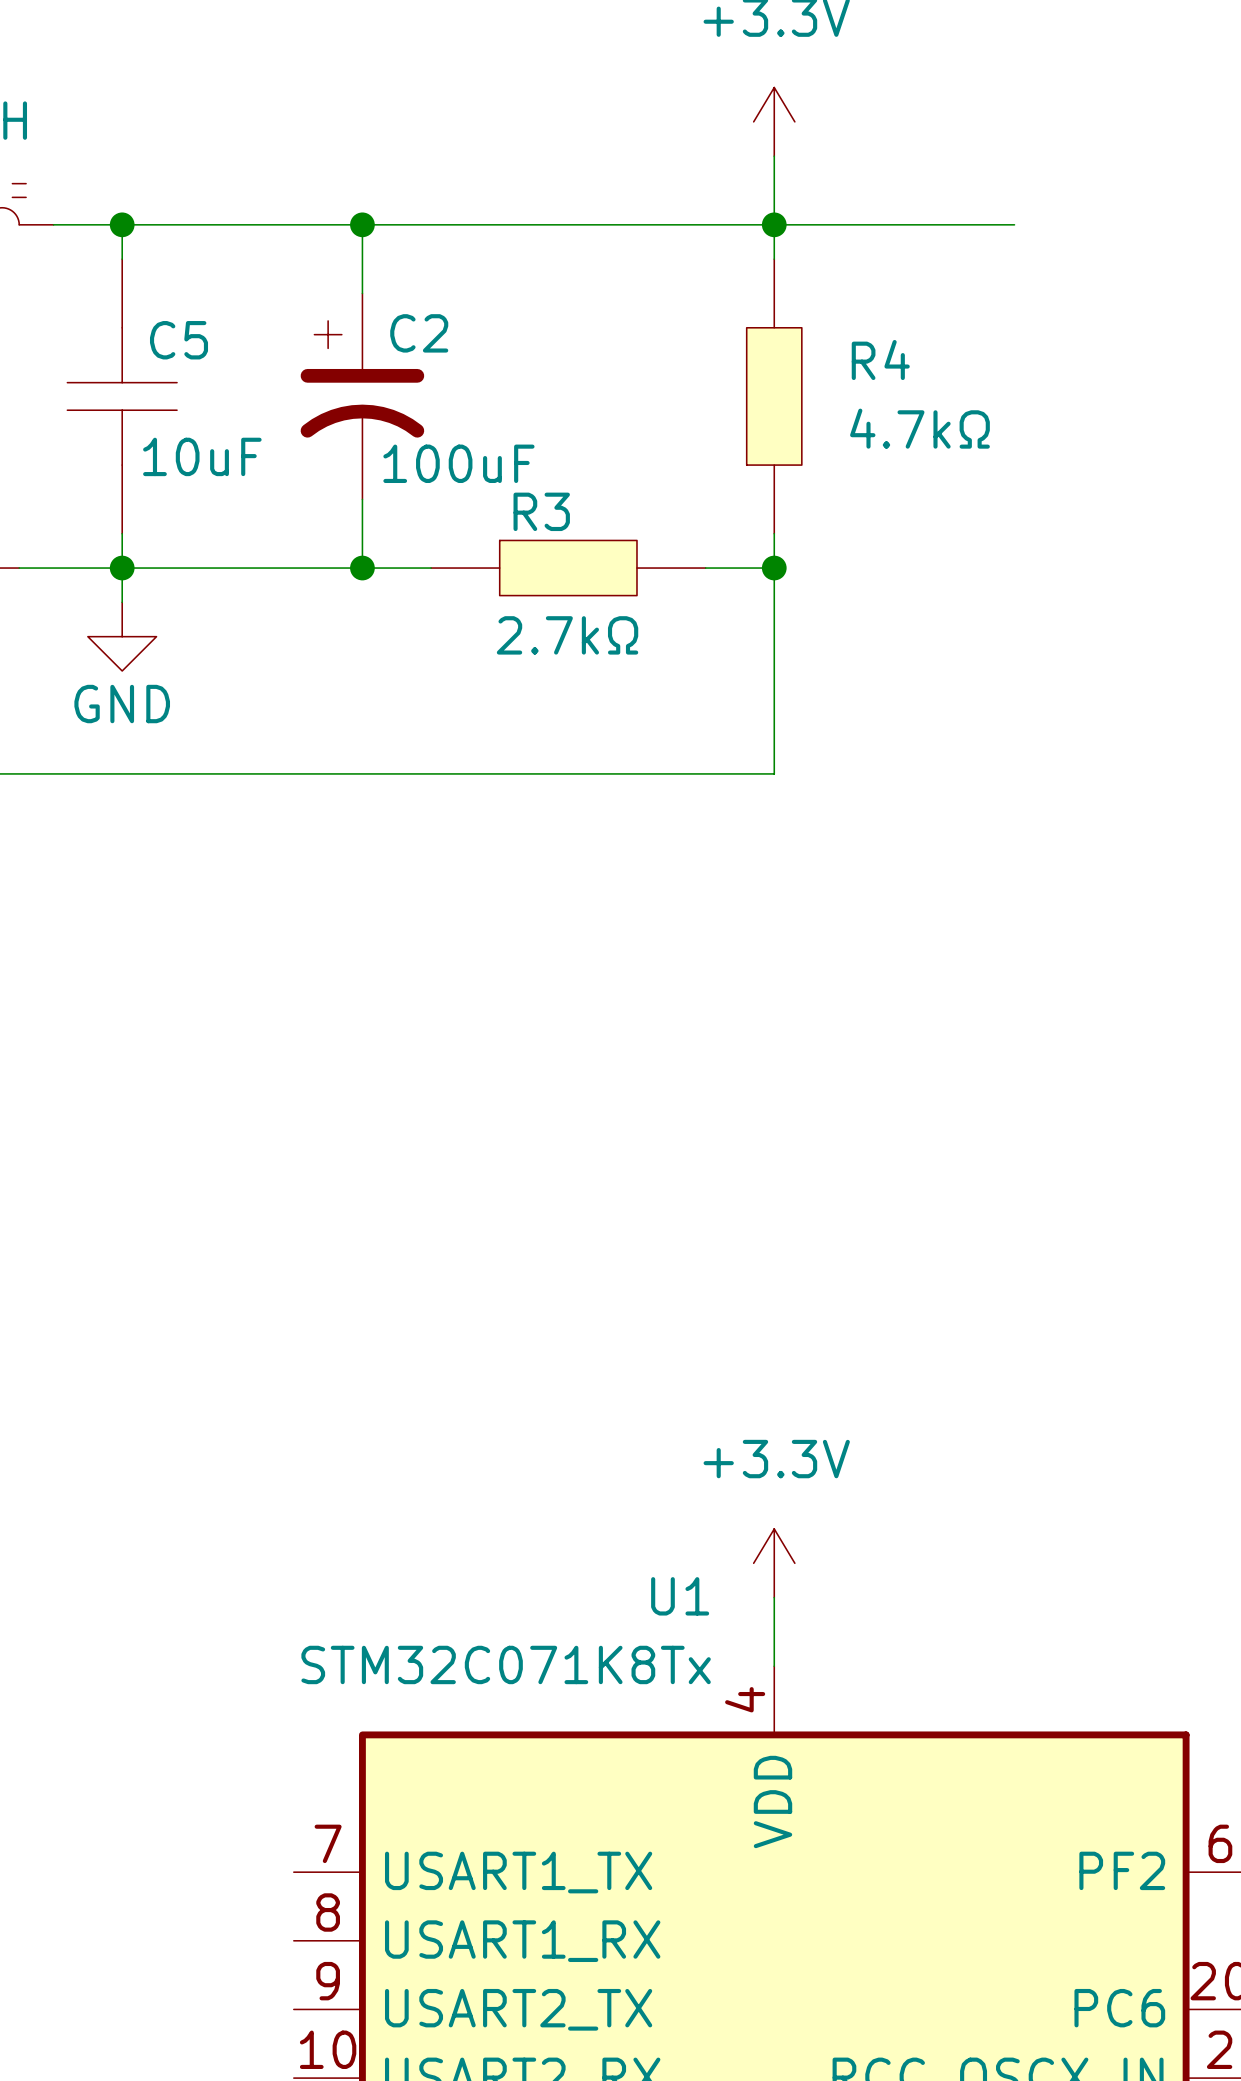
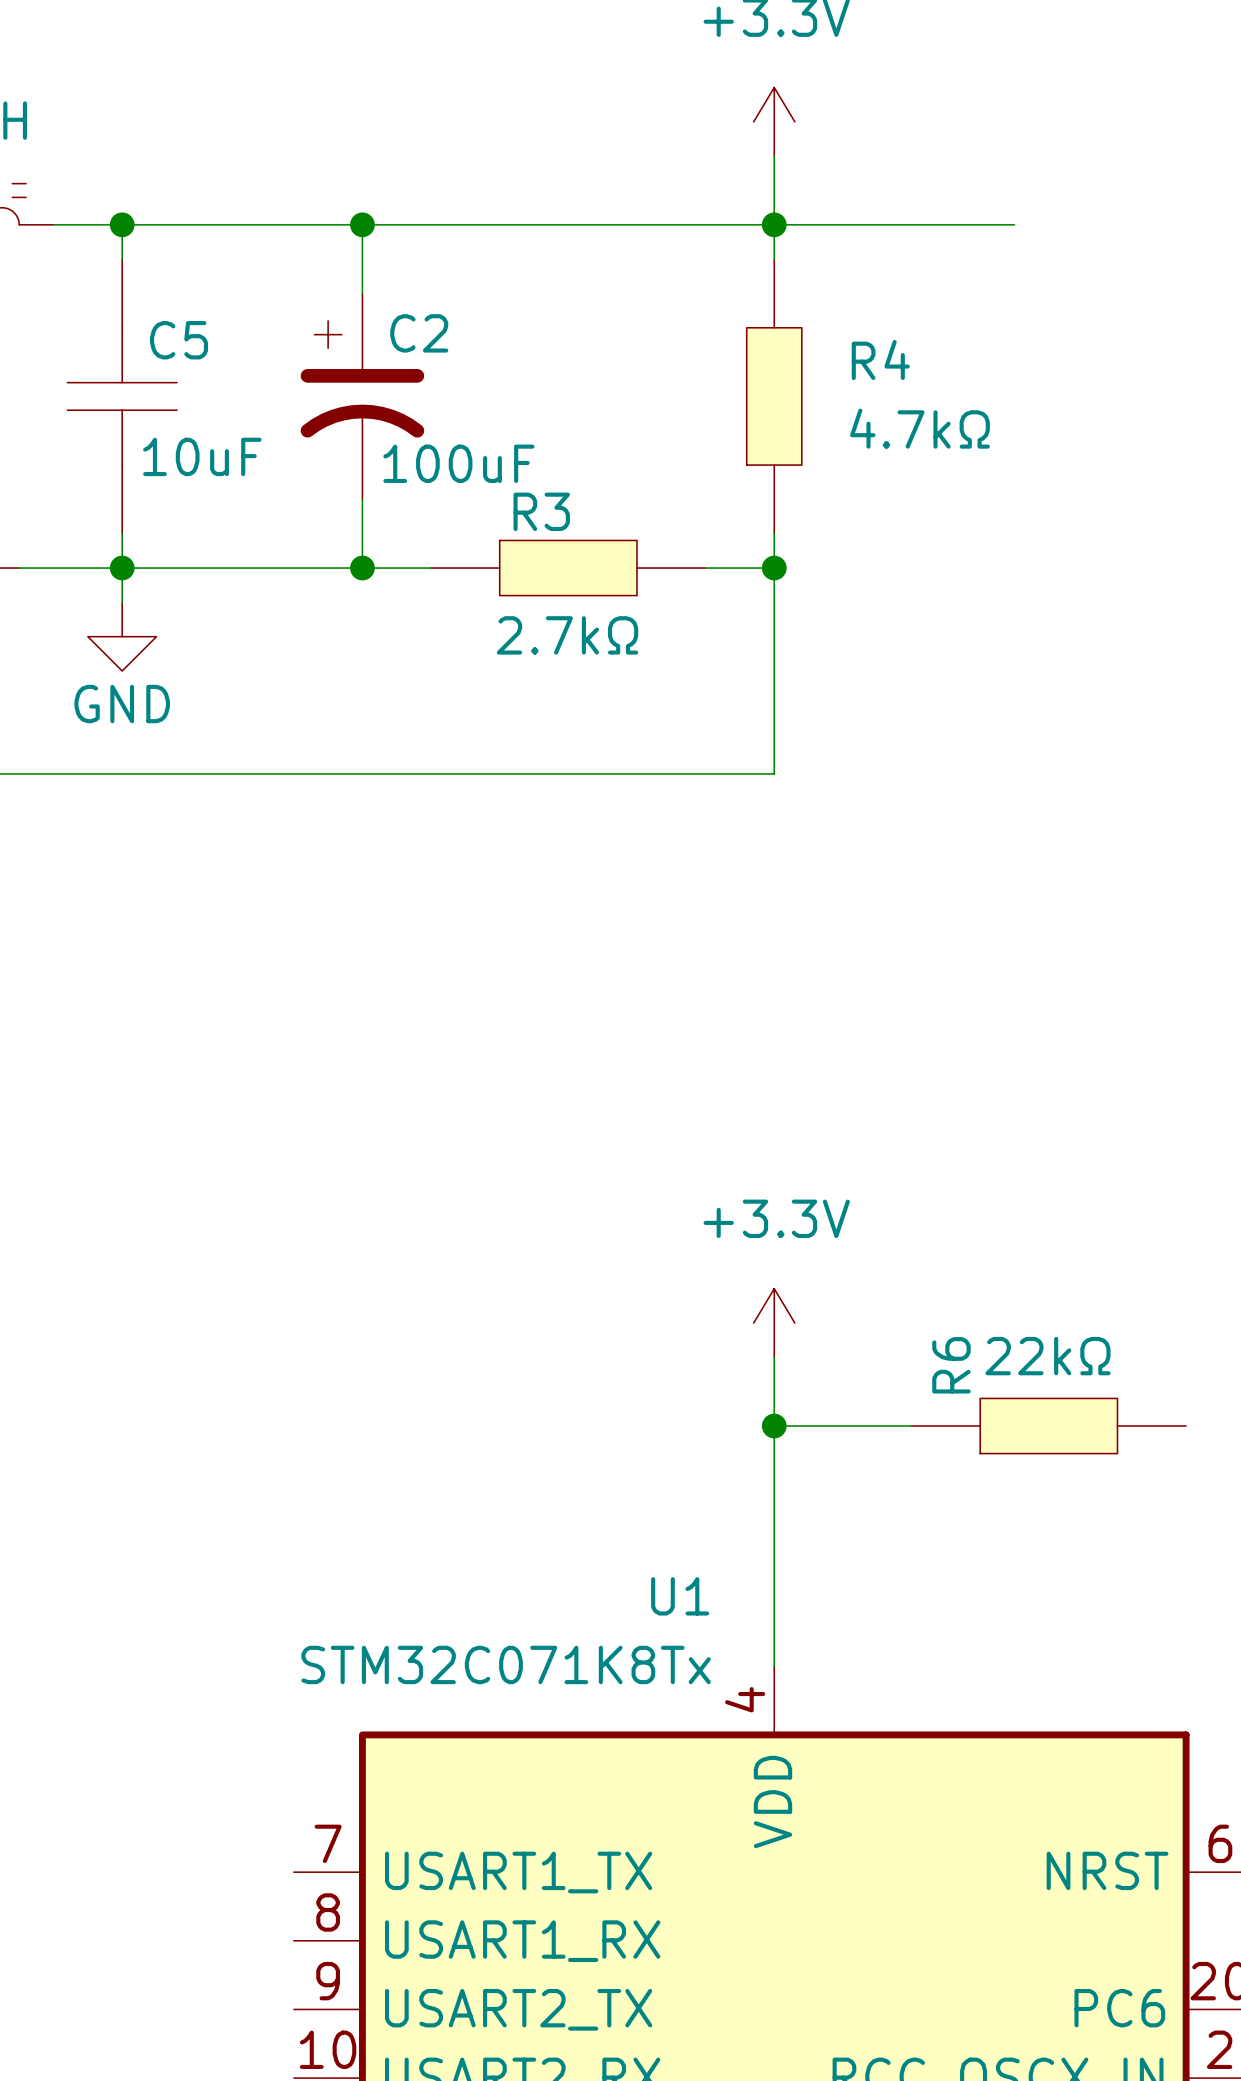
wire: none -> (774, 1357) (774, 1597)
wire: none -> (774, 1426) (911, 1426)
junction: none -> (774, 1426)
R6: none -> 22kΩ (1048, 1426)
power symbol position: +3.3V (774, 1563) -> +3.3V (774, 1323)
U1 pin name: PF2 (1122, 1870) -> NRST (1107, 1870)

